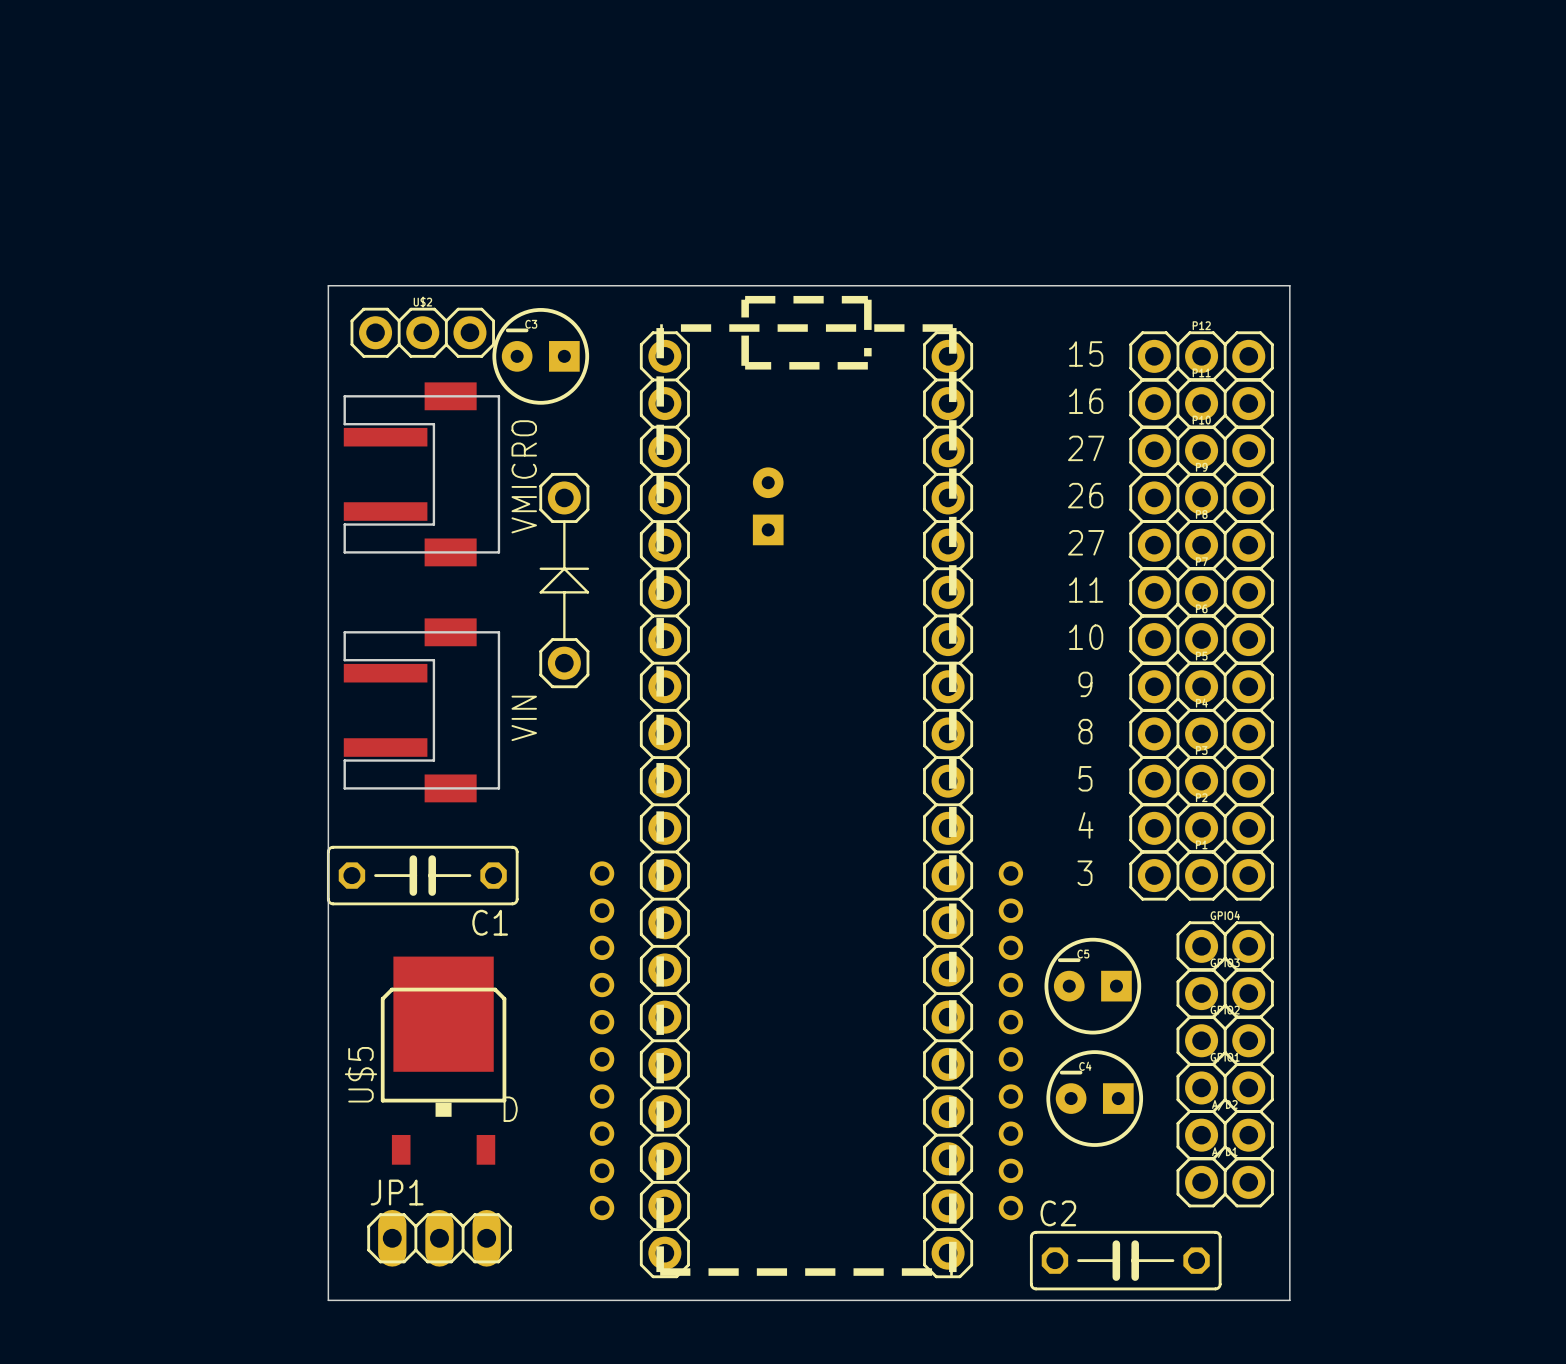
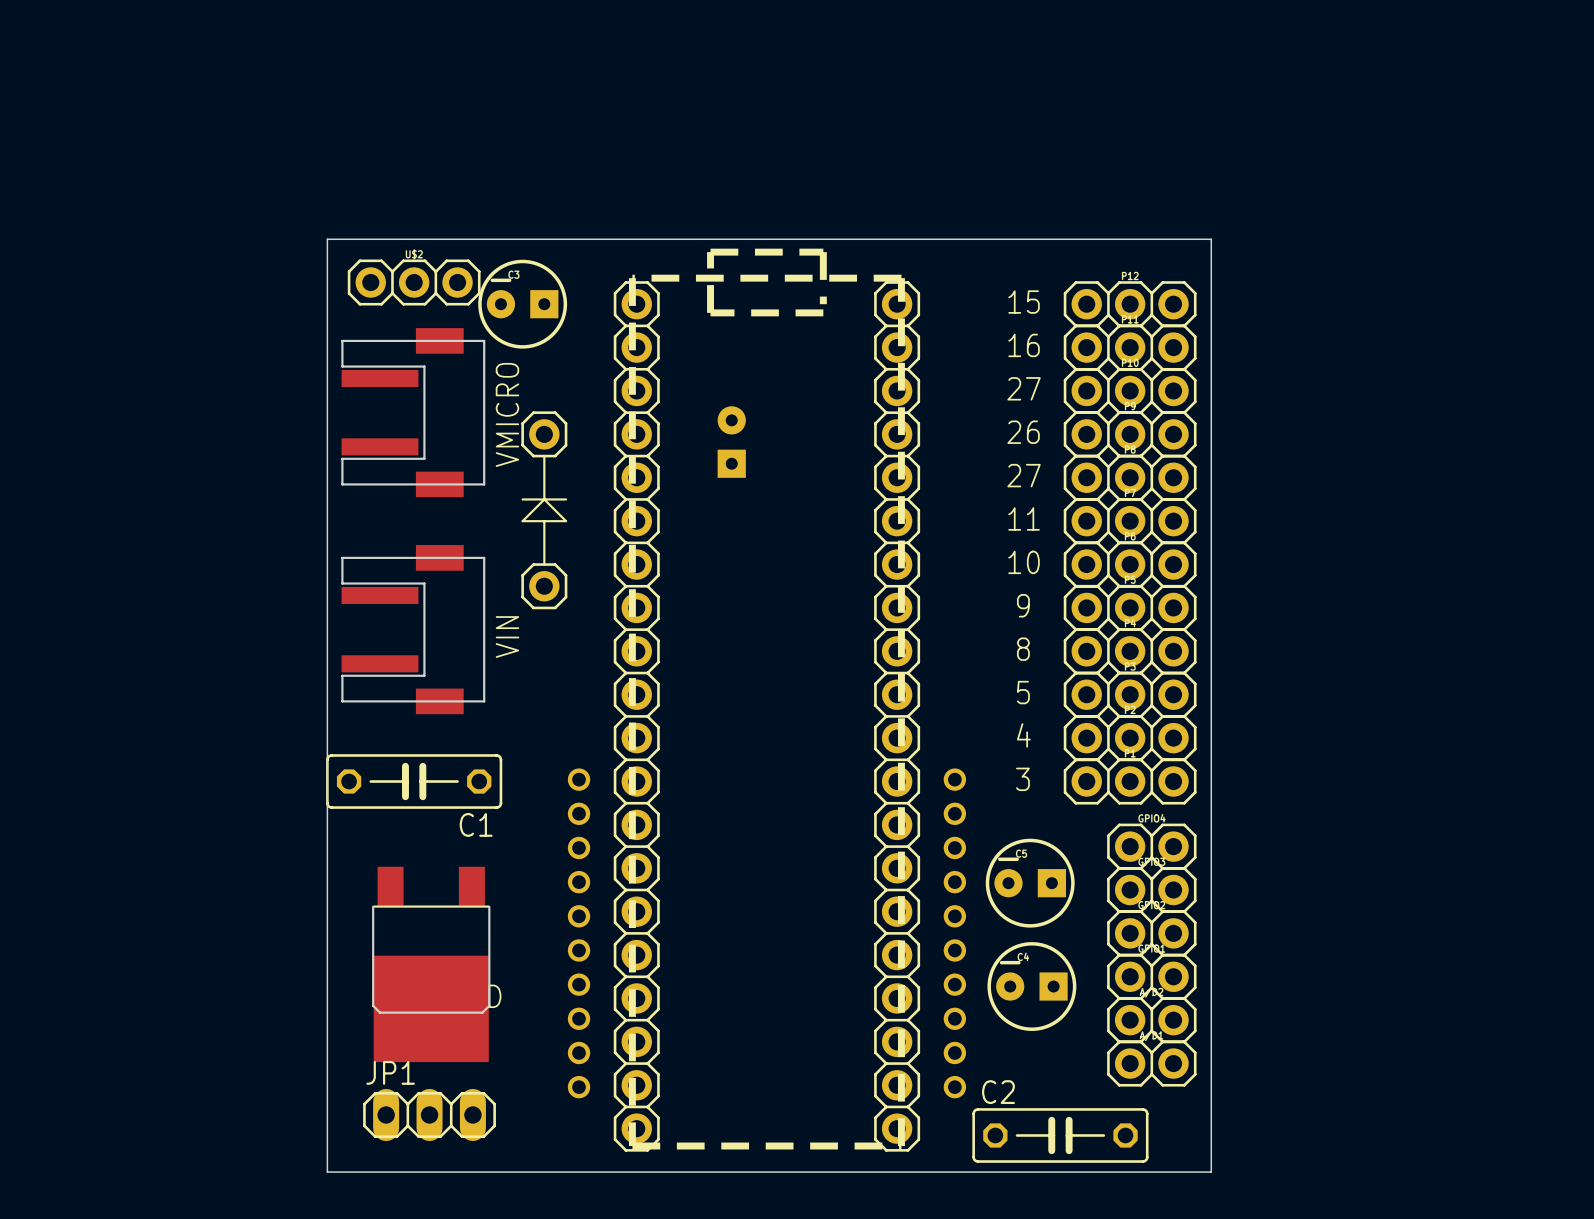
U$5: (443, 1060) -> none
part: none -> (431, 964)

